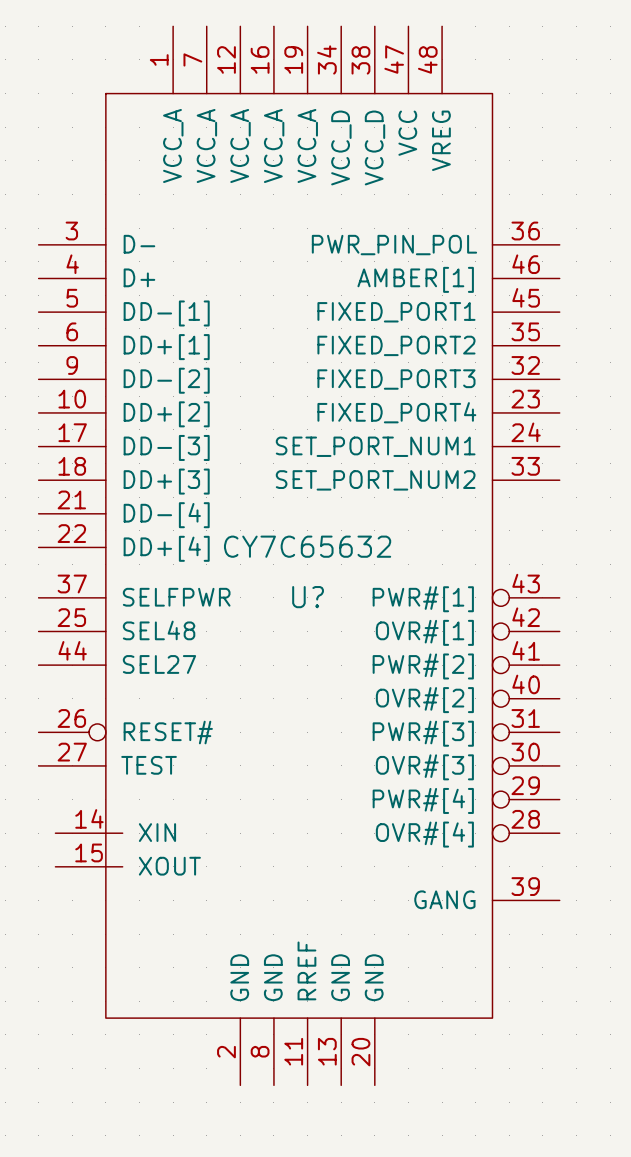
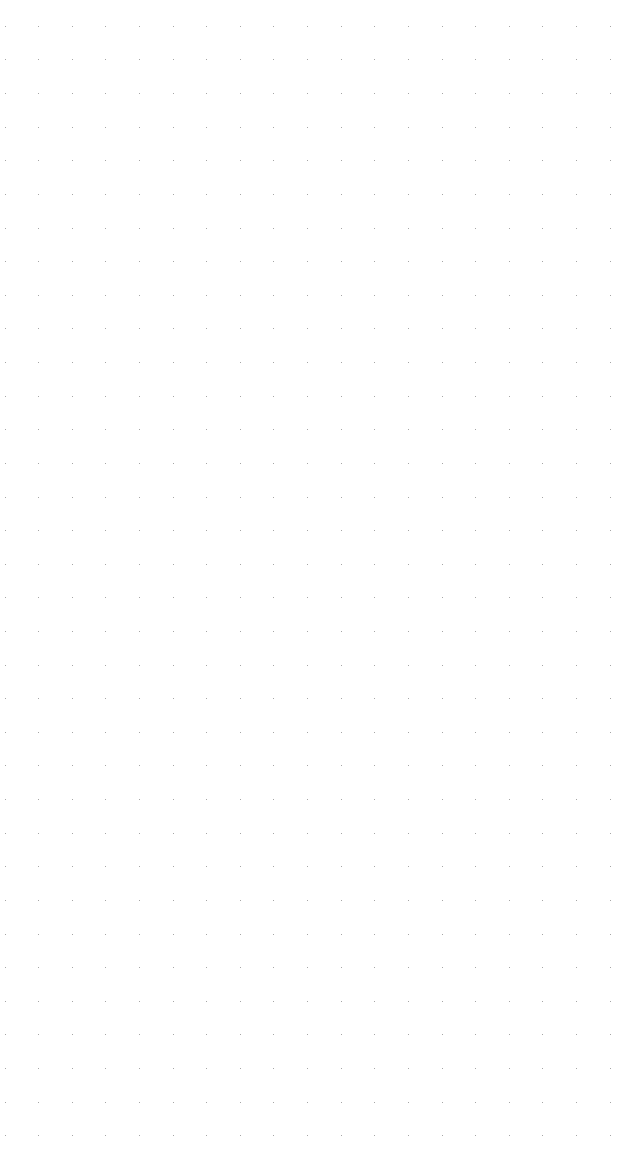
U?: CY7C65632 (299, 555) -> none

